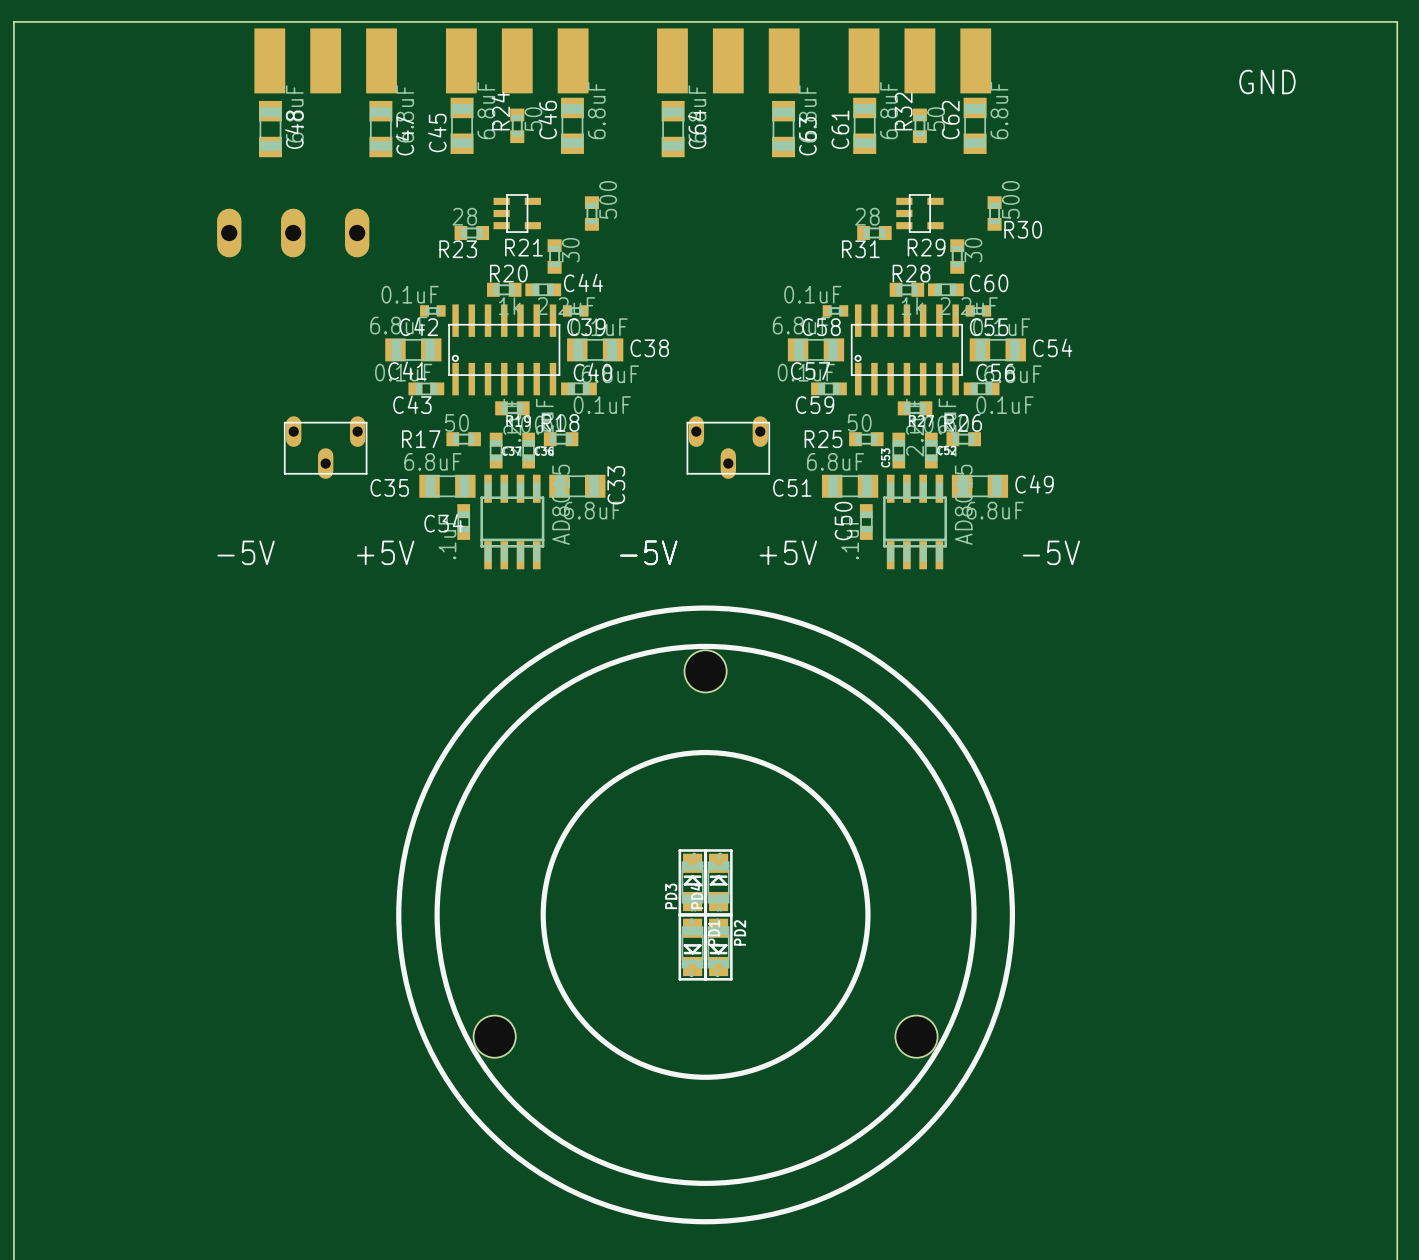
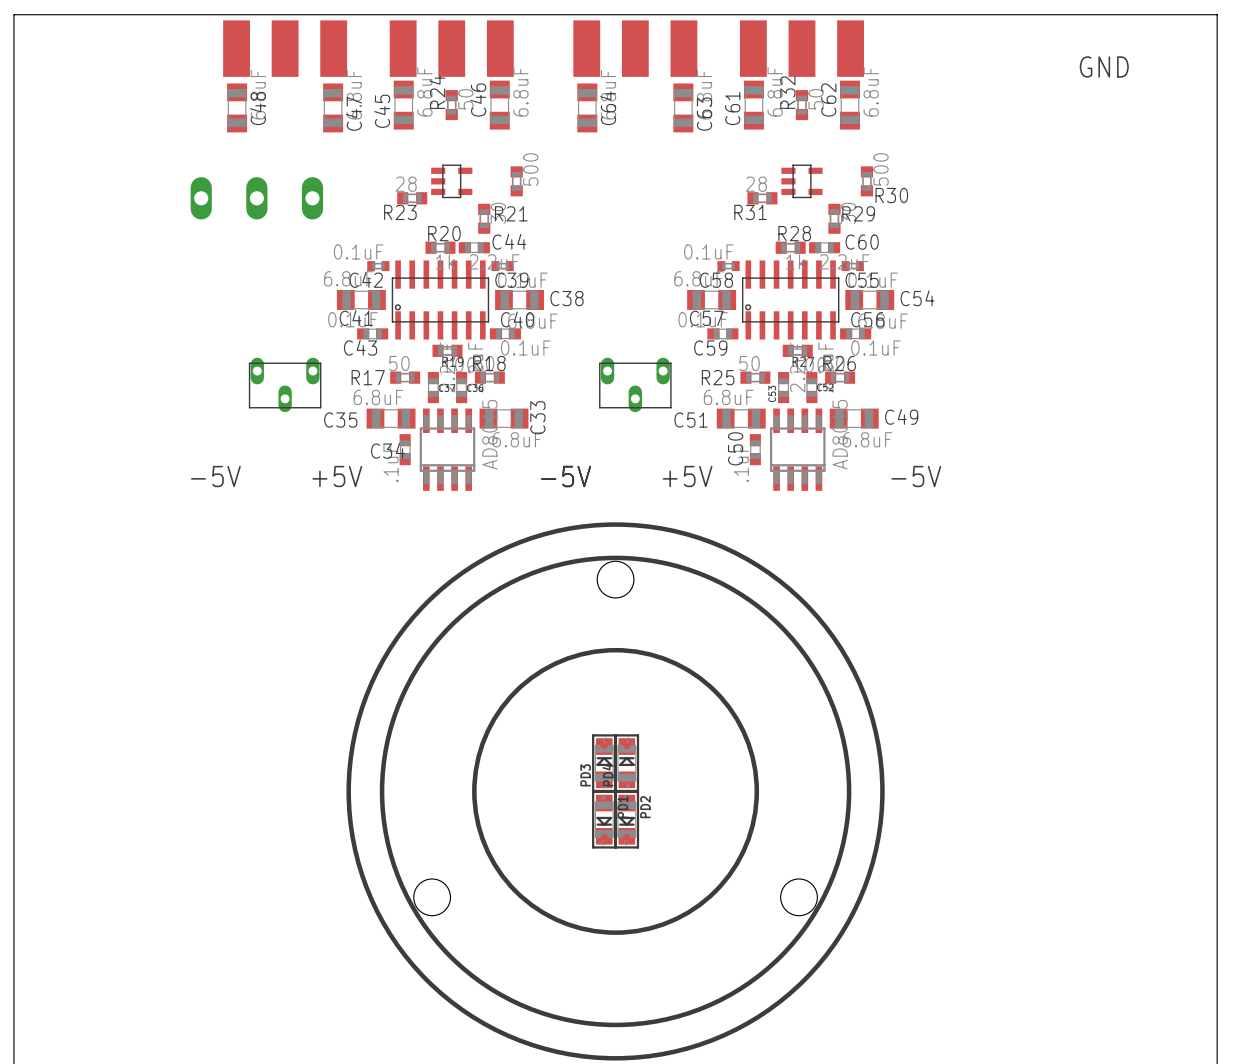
R21 name position: R21 (523, 247) -> R21 (511, 213)
R29 name position: R29 (926, 247) -> R29 (858, 213)

